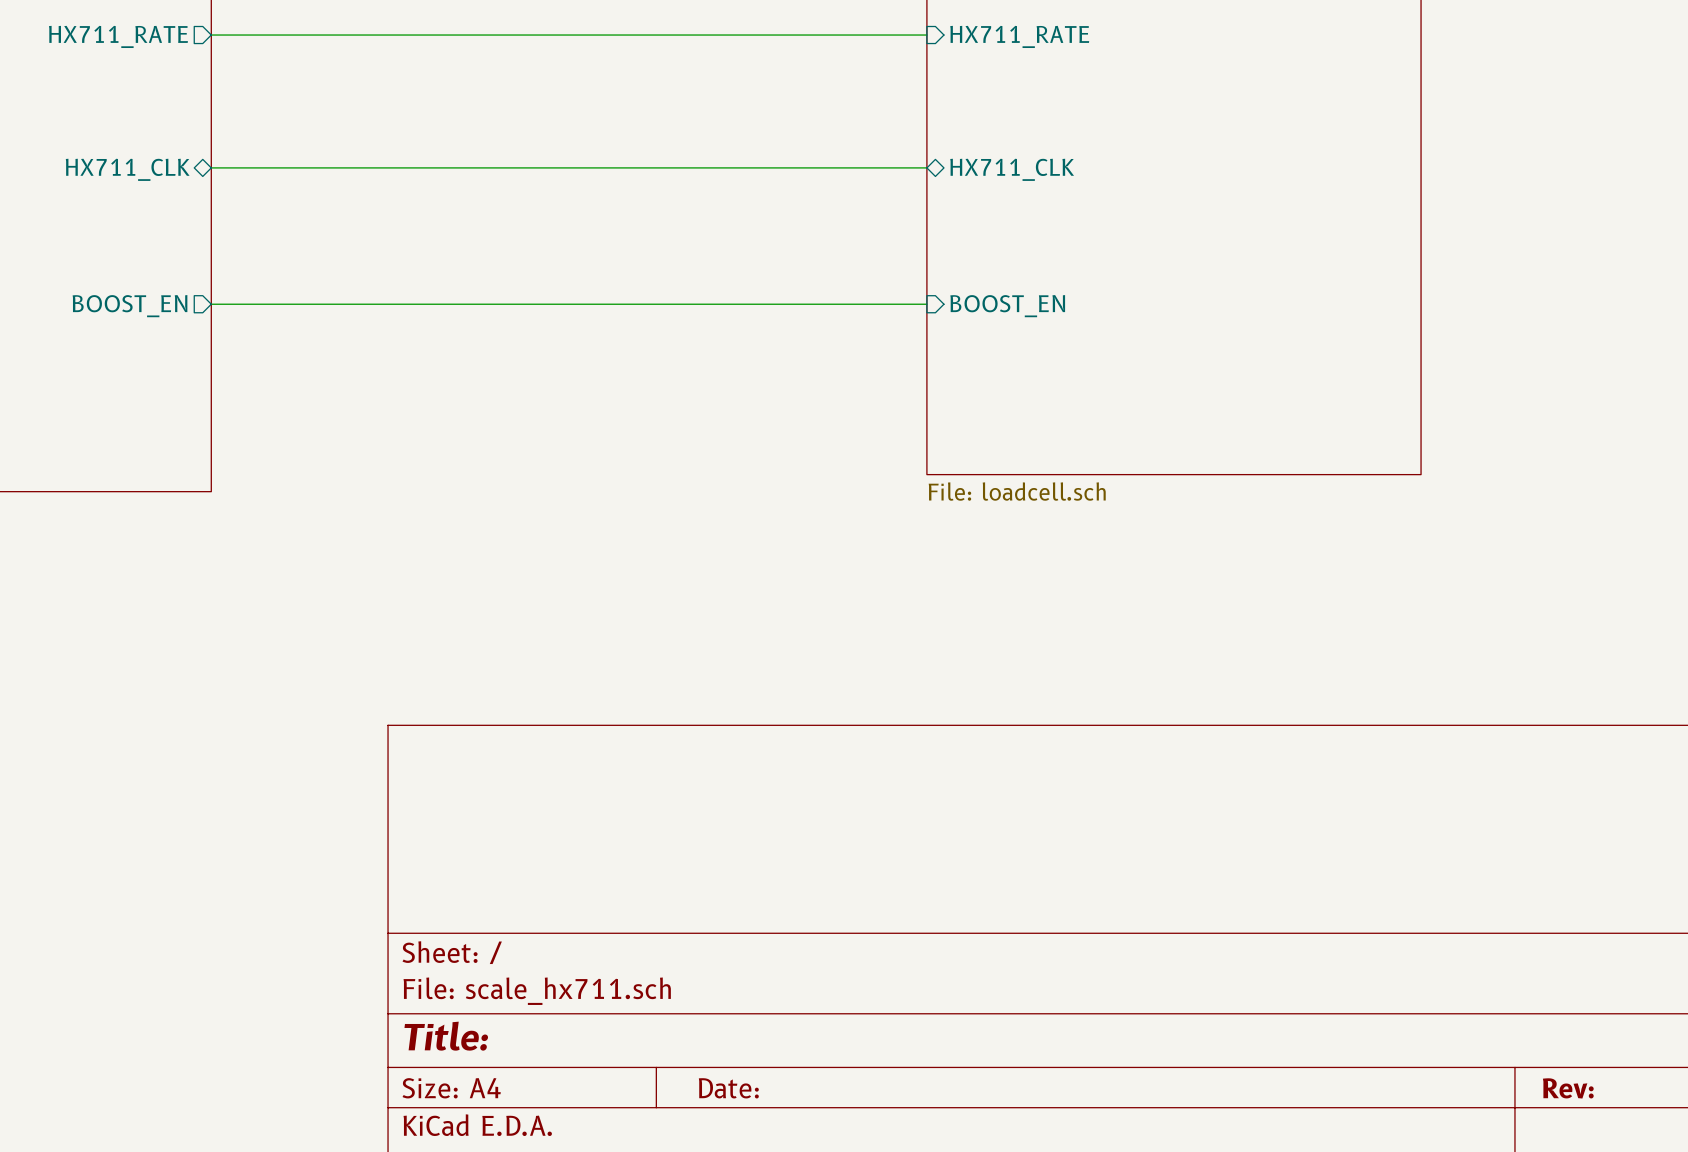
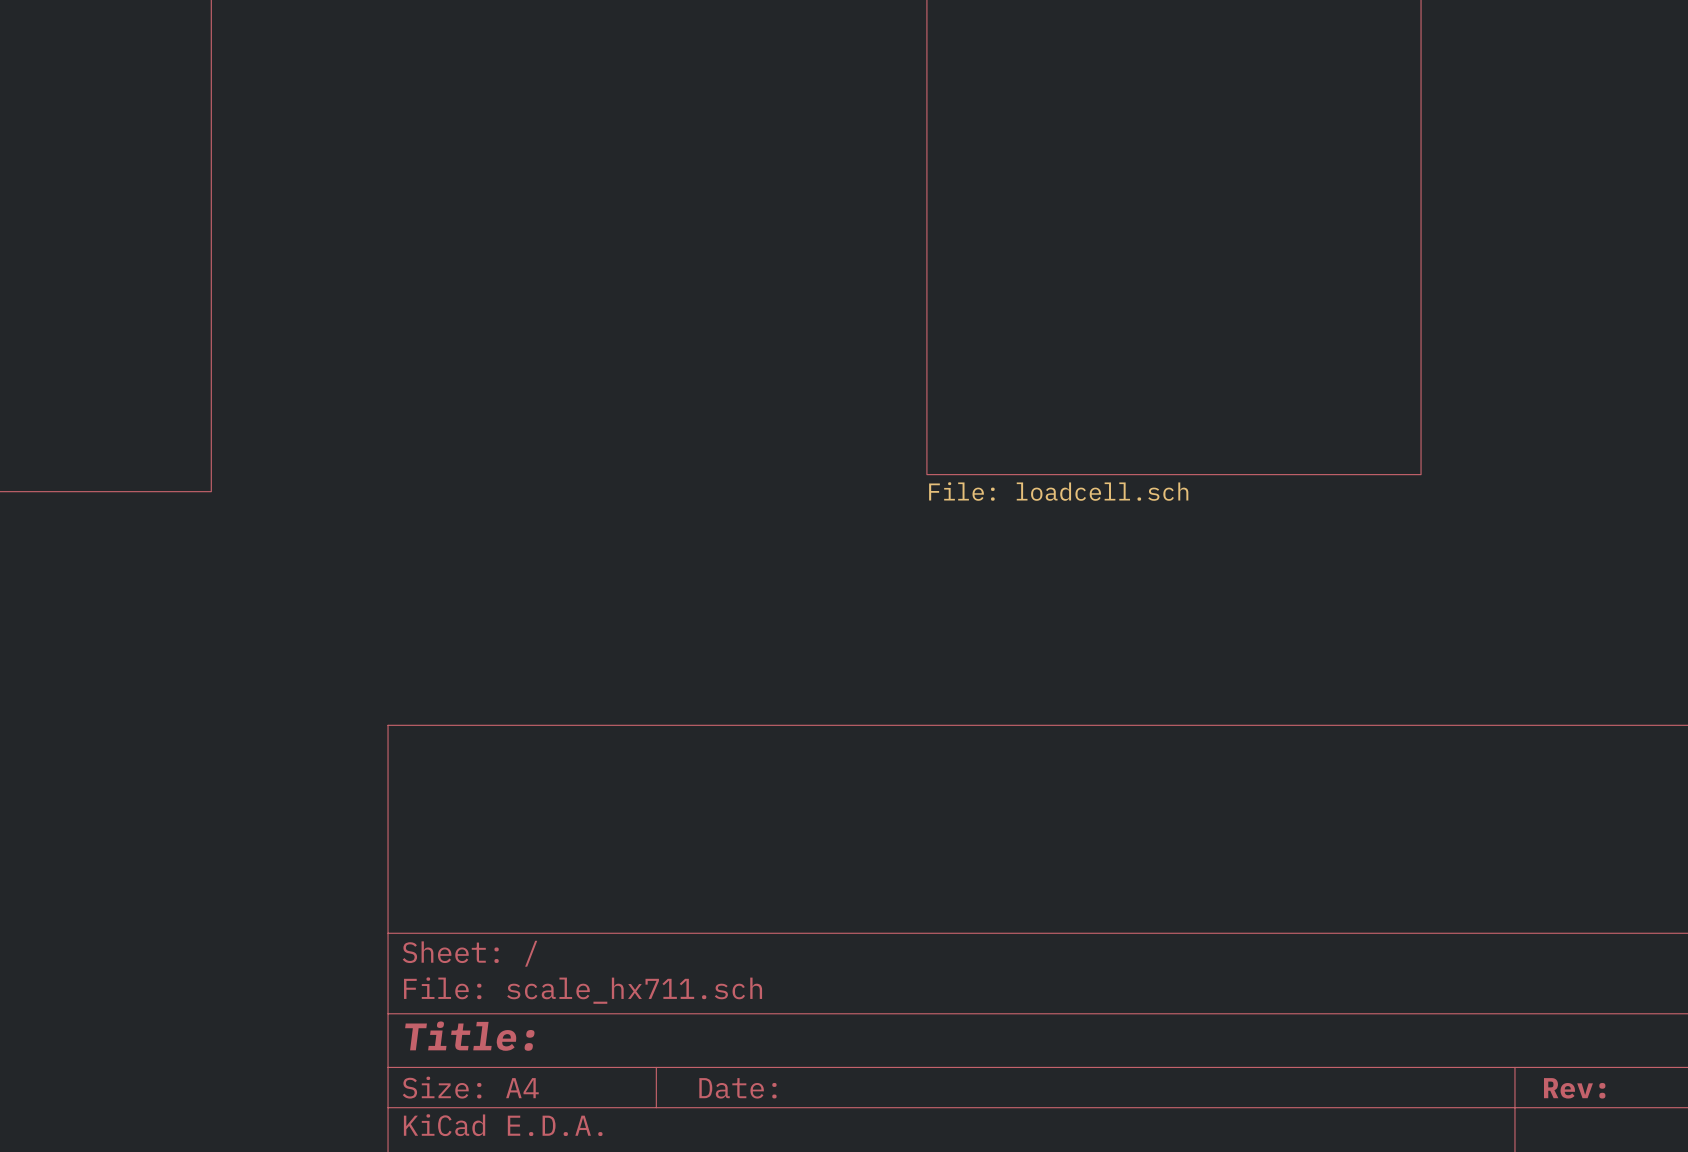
wire: (211, 35) (926, 35) -> none
sheet pin: HX711_RATE (118, 36) -> none
sheet pin: HX711_RATE (1019, 36) -> none
wire: (211, 167) (926, 167) -> none
sheet pin: HX711_CLK (127, 169) -> none
sheet pin: HX711_CLK (1012, 169) -> none
wire: (211, 304) (926, 304) -> none
sheet pin: BOOST_EN (130, 306) -> none
sheet pin: BOOST_EN (1007, 306) -> none

